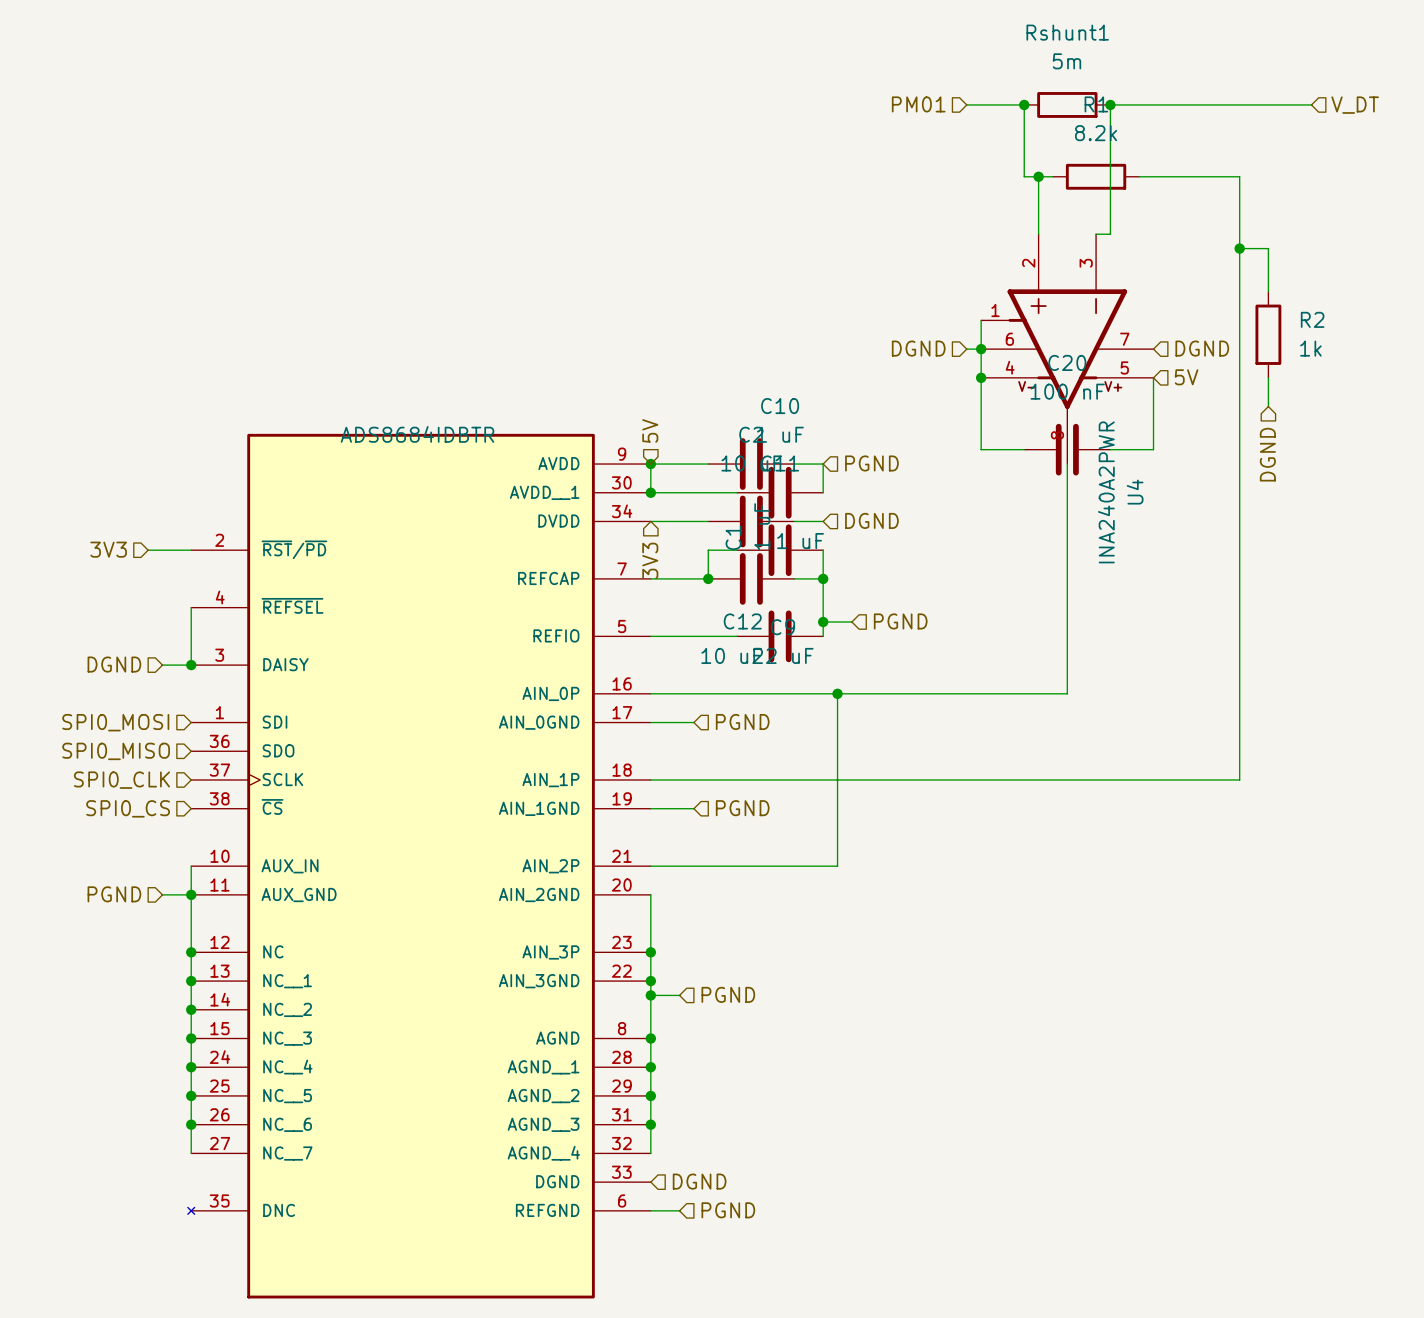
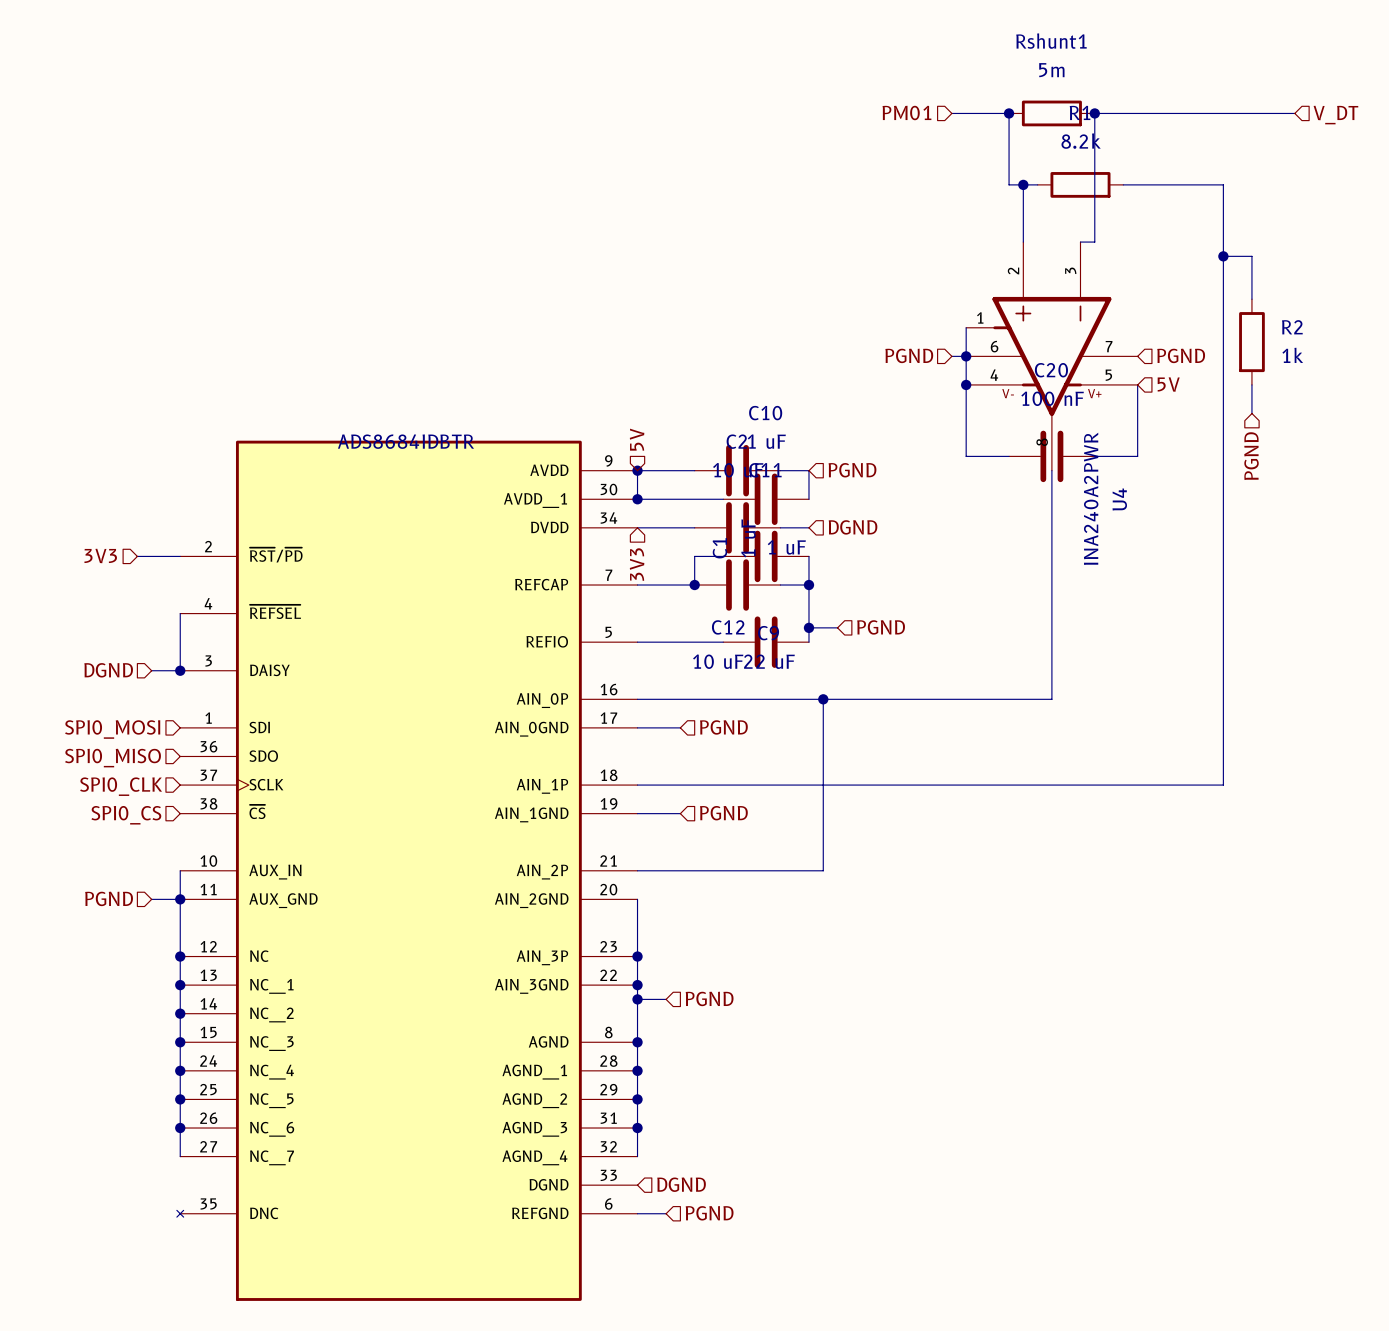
hierarchical label: DGND (918, 348) -> PGND (909, 355)
hierarchical label: DGND (1202, 348) -> PGND (1181, 355)
hierarchical label: DGND (1267, 454) -> PGND (1251, 456)

